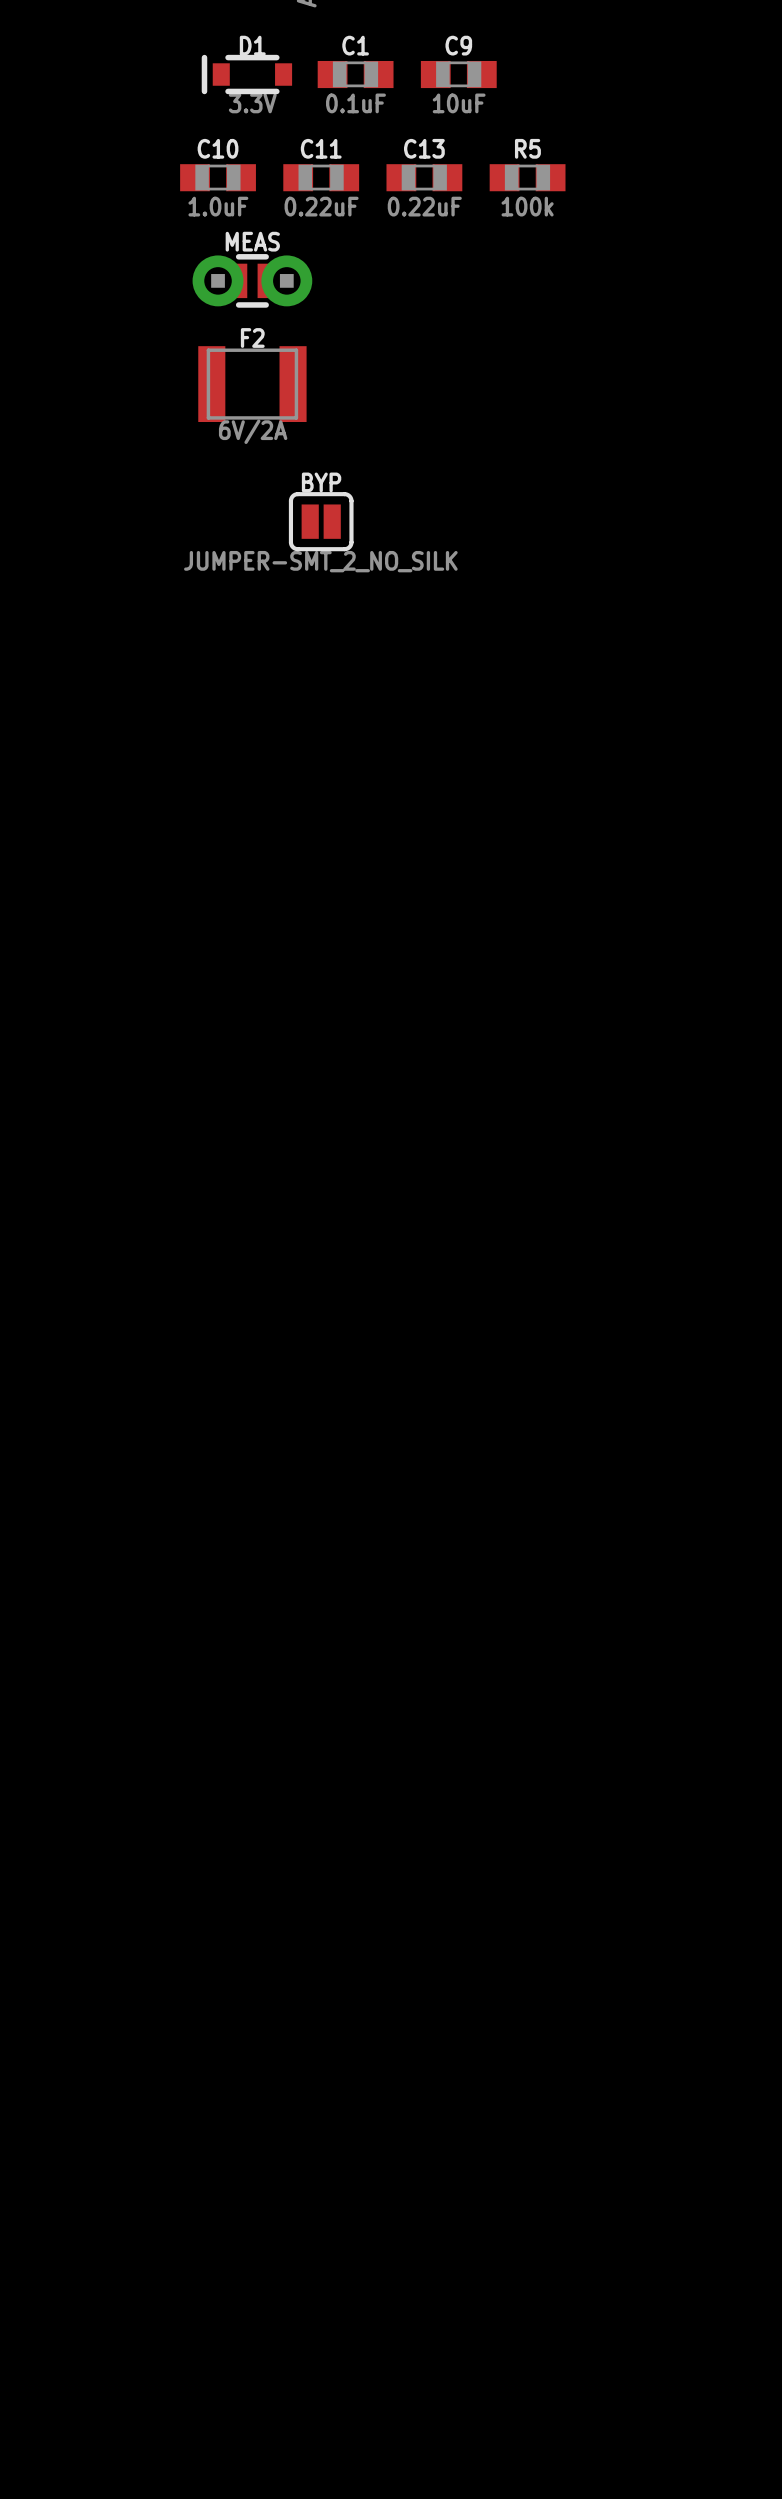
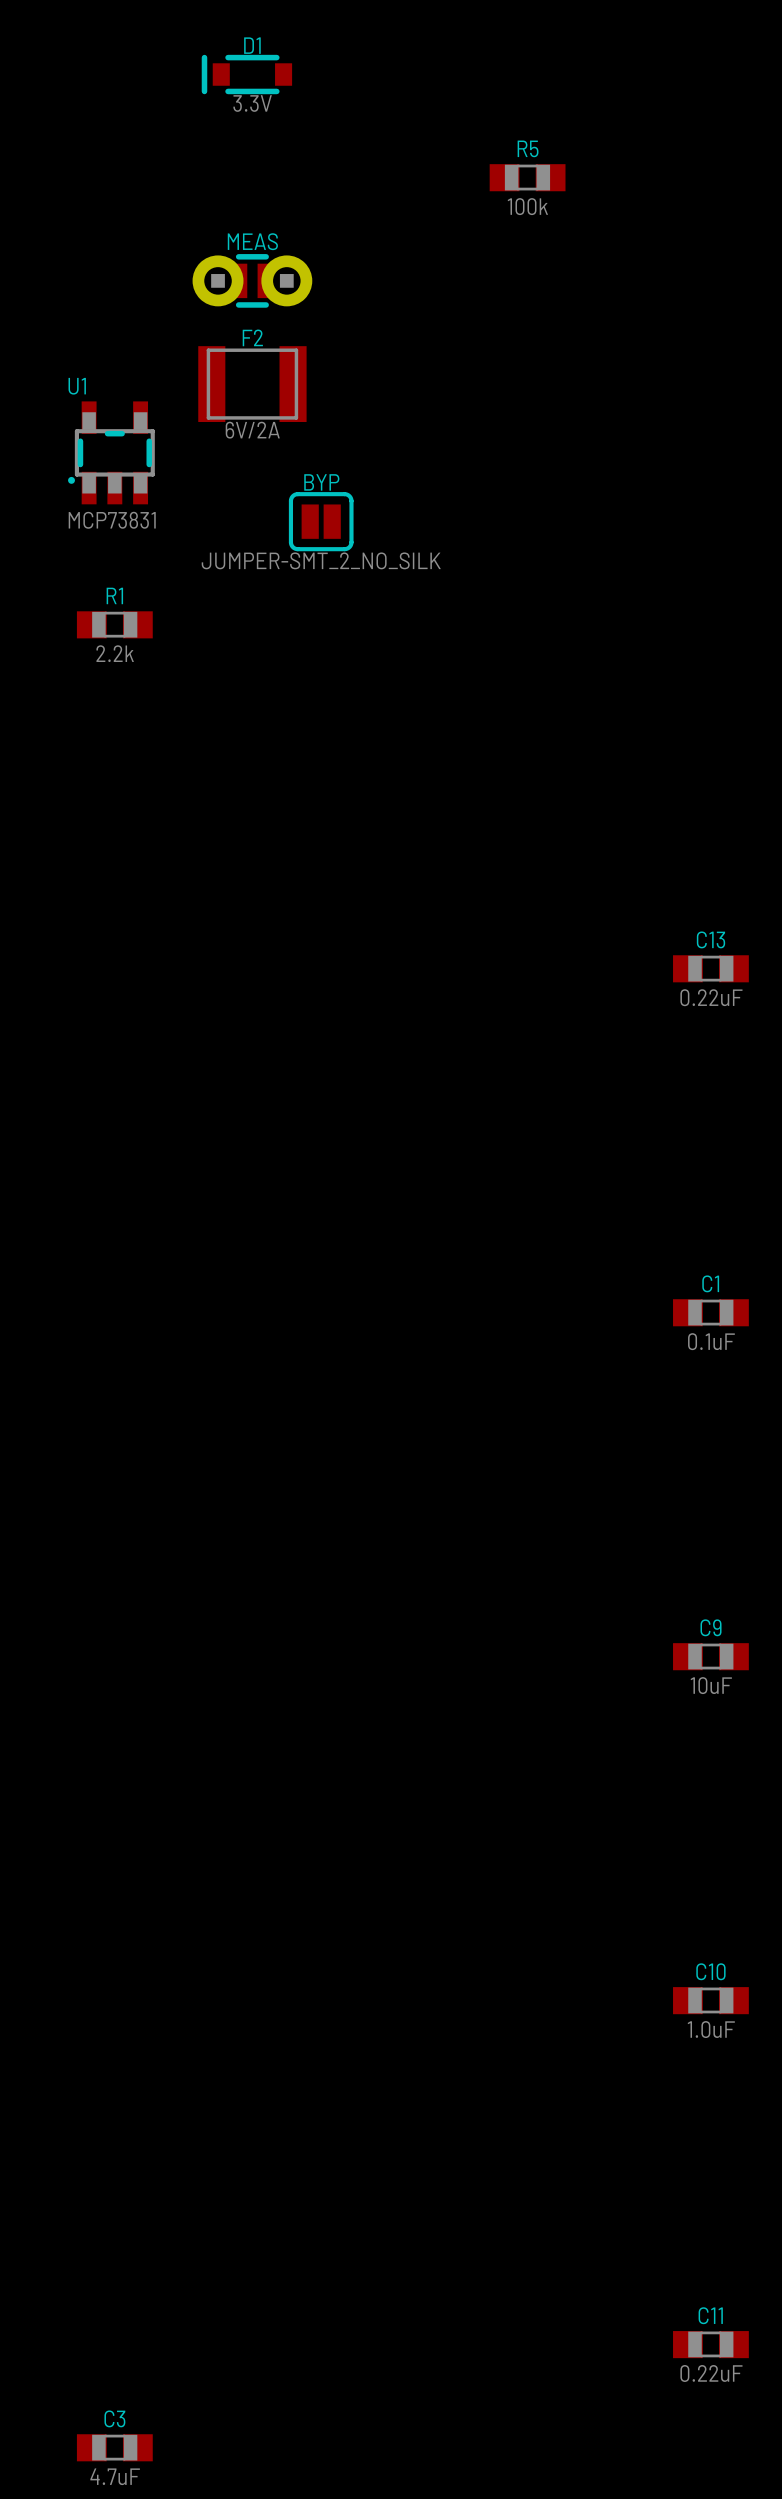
C1 position: (355, 74) -> (710, 1312)
C9 position: (458, 74) -> (710, 1656)
C10 position: (218, 177) -> (710, 2000)
C11 position: (321, 177) -> (710, 2344)
C13 position: (424, 177) -> (710, 968)
U1: none -> MCP73831 (111, 452)
R1: none -> 2.2k (114, 624)
C3: none -> 4.7uF (114, 2447)

